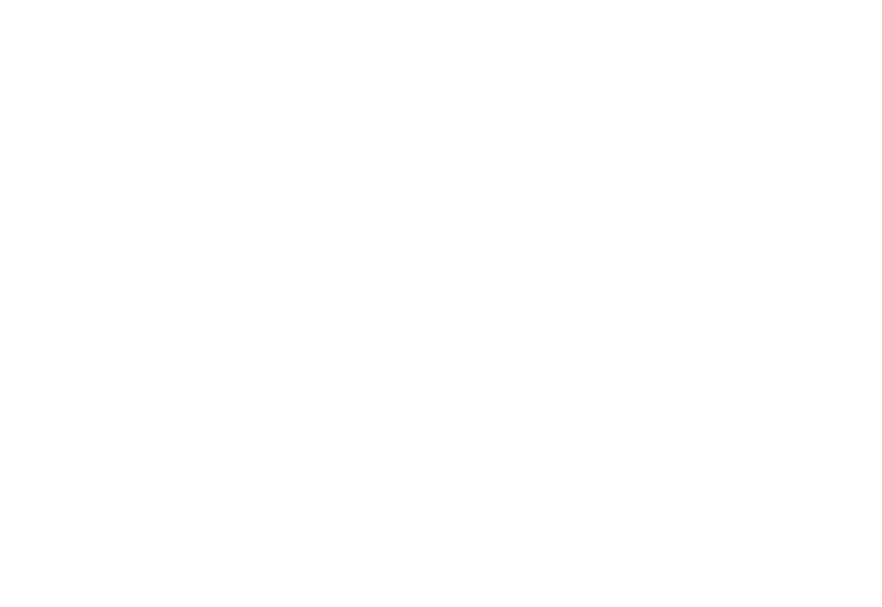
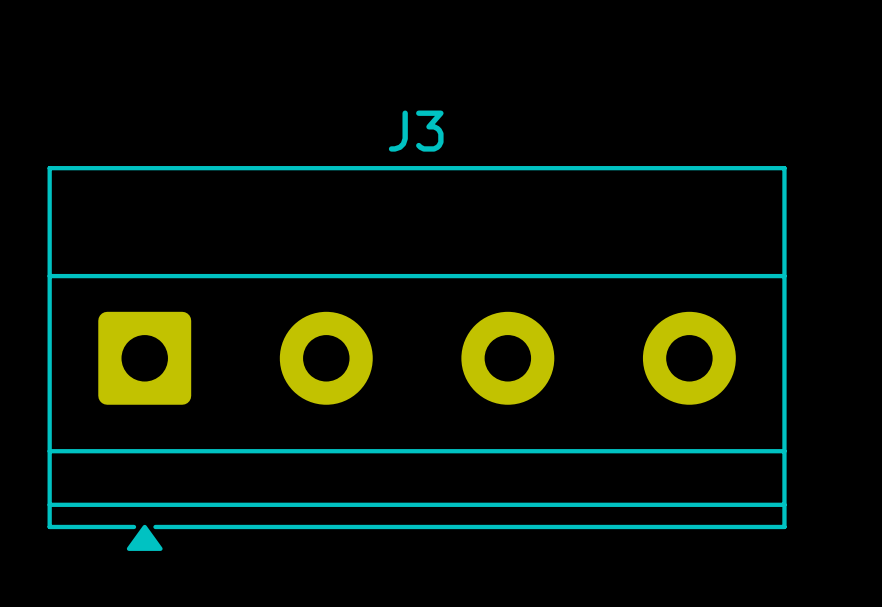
J3: none -> (417, 358)

